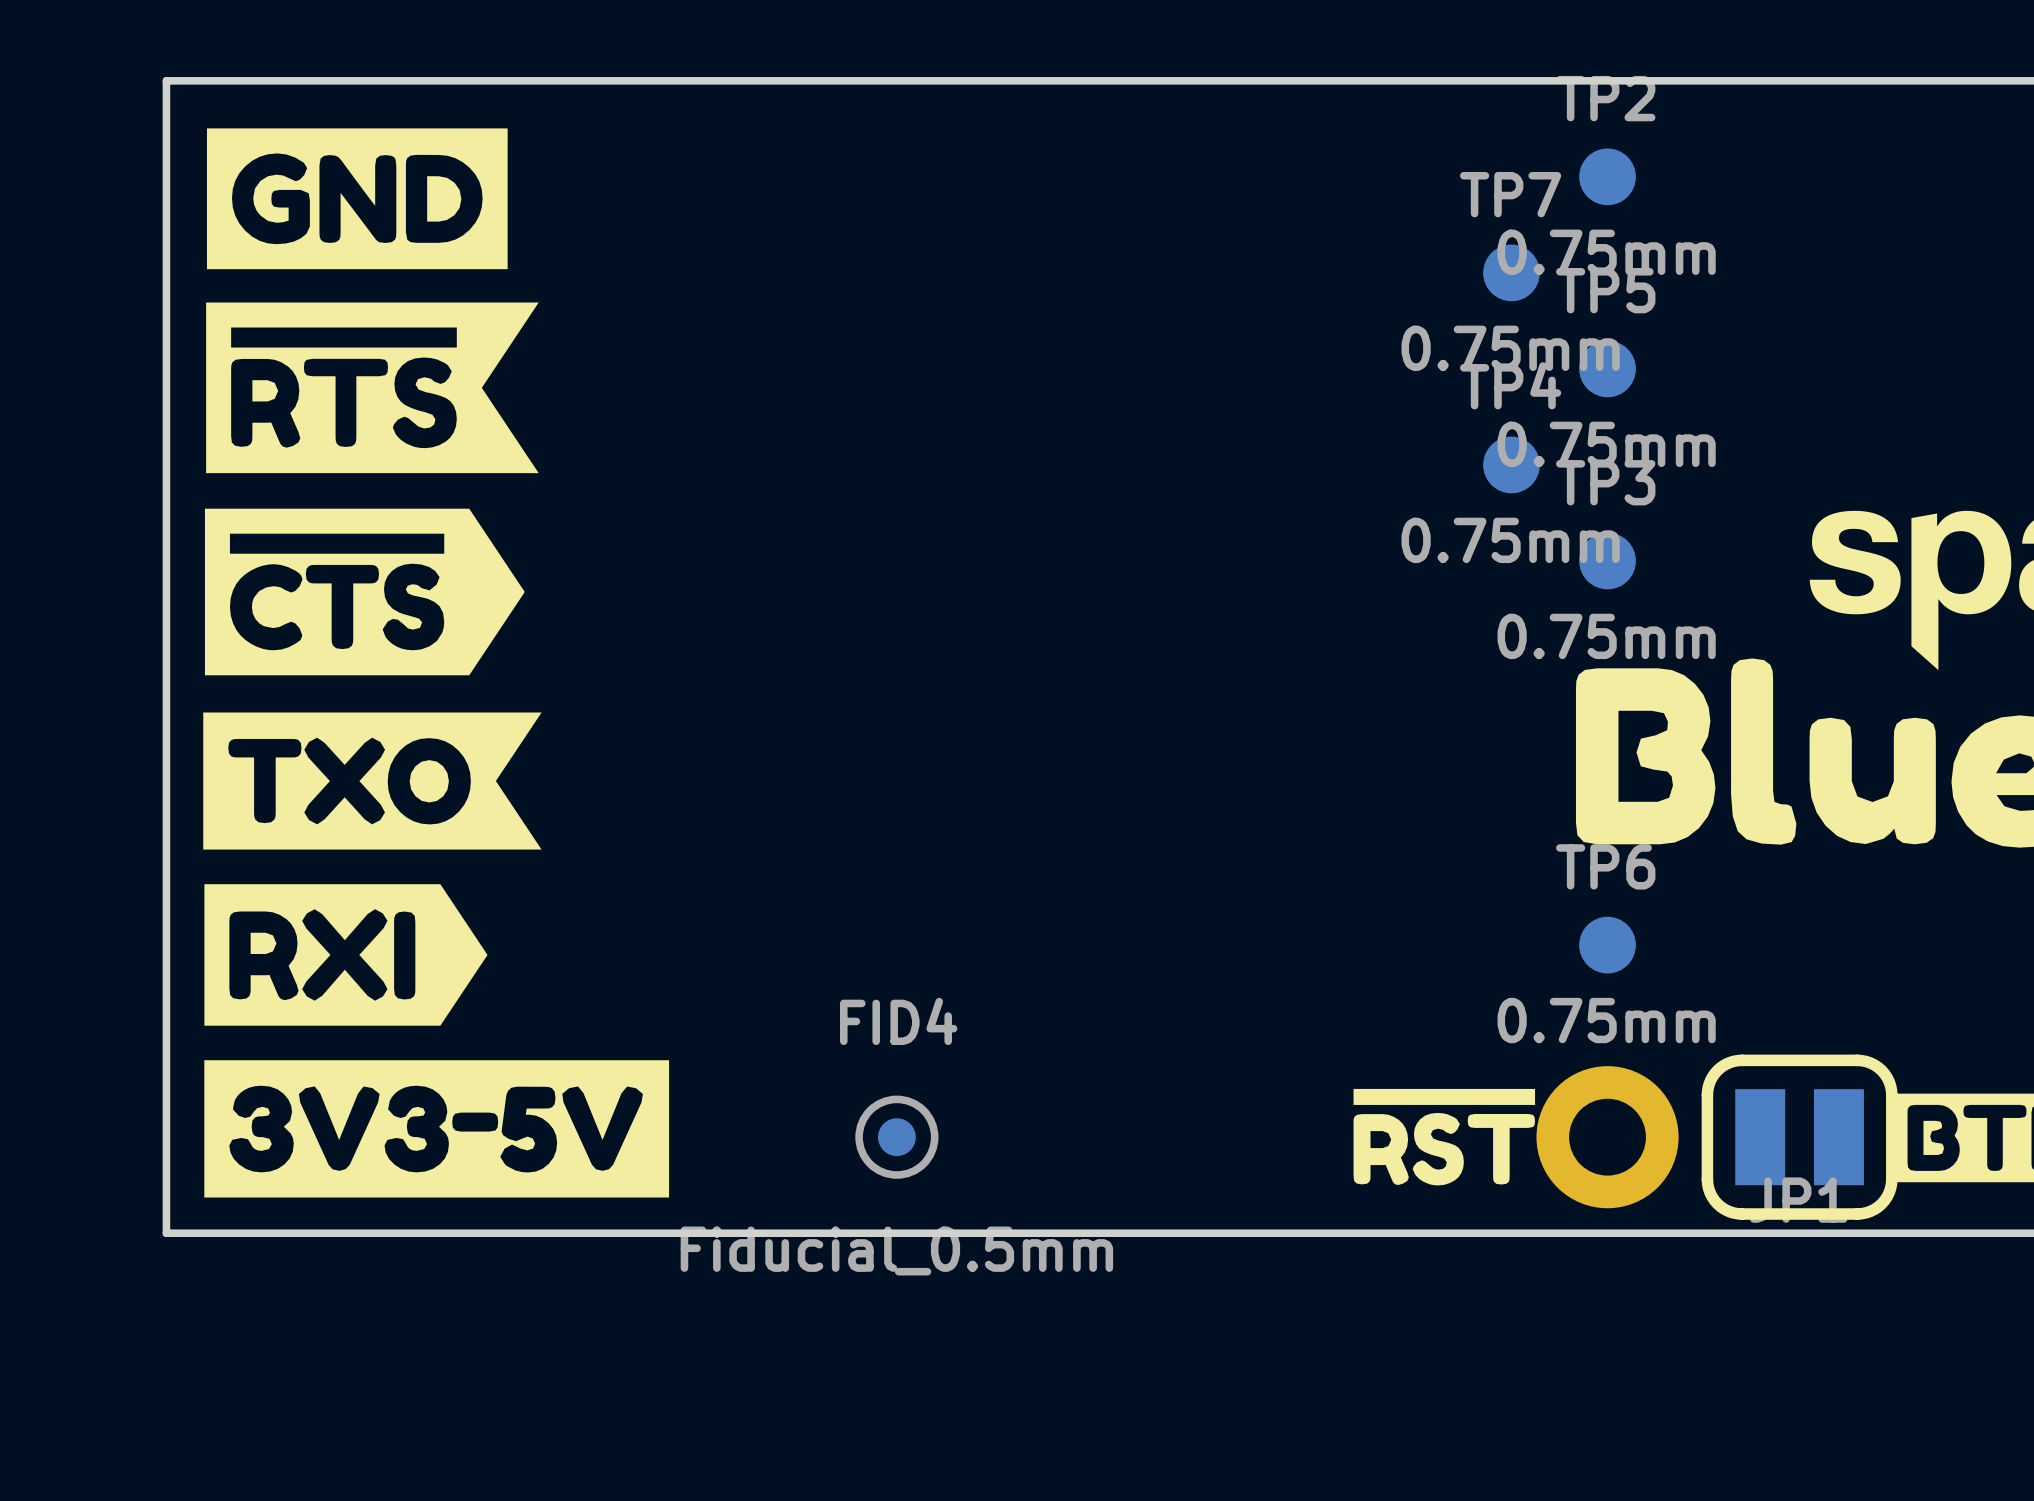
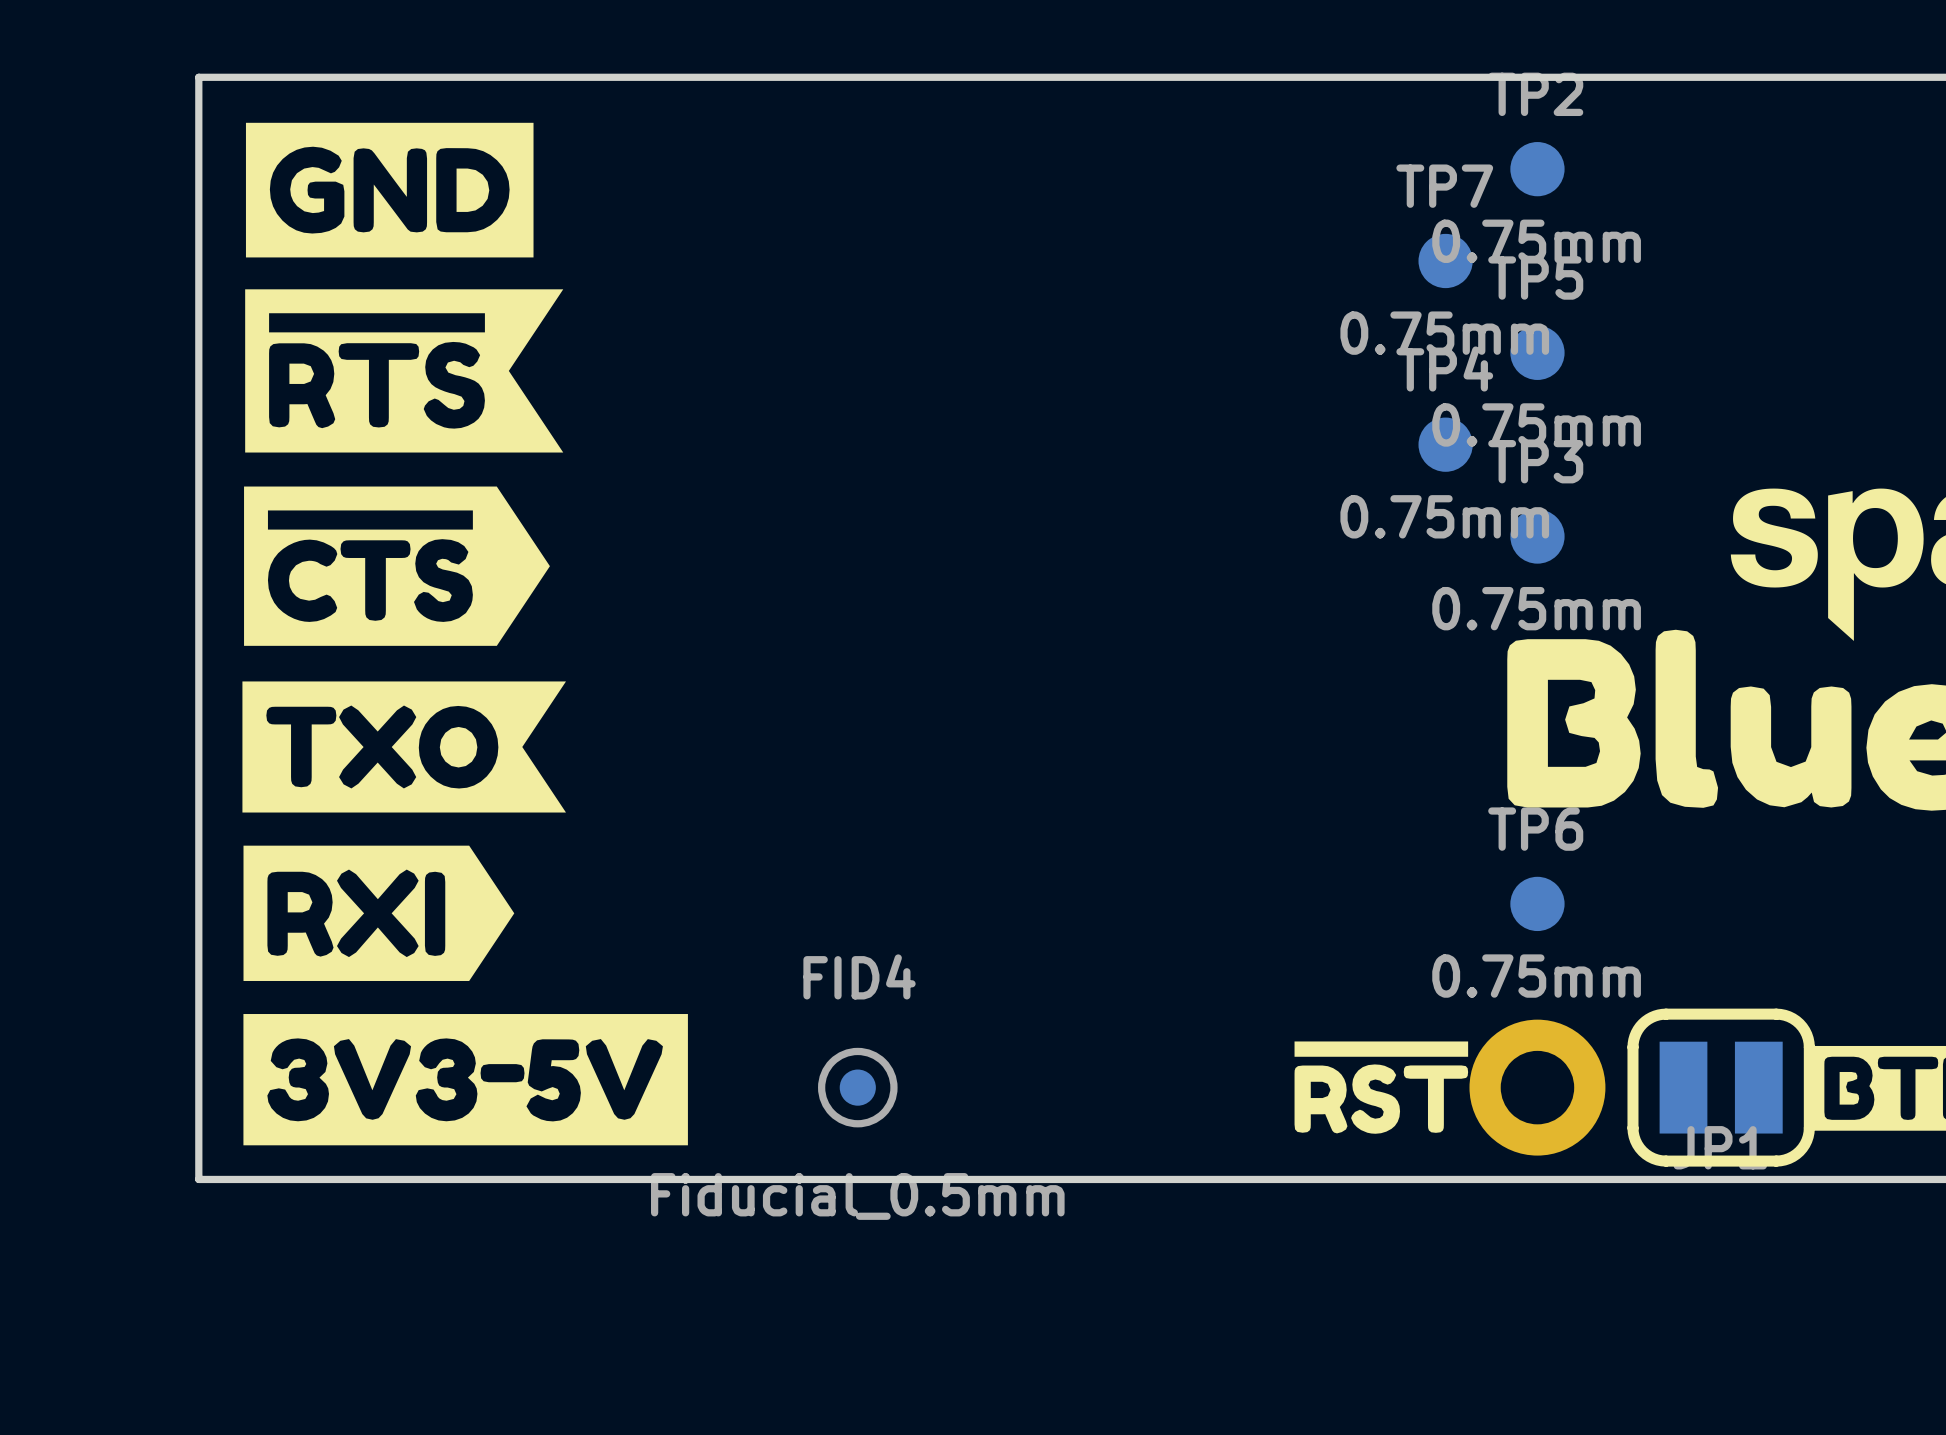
board edge: (207, 80) (166, 80) (166, 1233) (207, 1233) -> (198, 77) (198, 1179)
drawing position: (357, 198) -> (389, 190)
drawing position: (372, 387) -> (404, 370)
drawing position: (364, 591) -> (396, 566)
drawing position: (372, 781) -> (404, 746)
drawing position: (345, 954) -> (378, 913)
drawing position: (436, 1128) -> (465, 1079)

